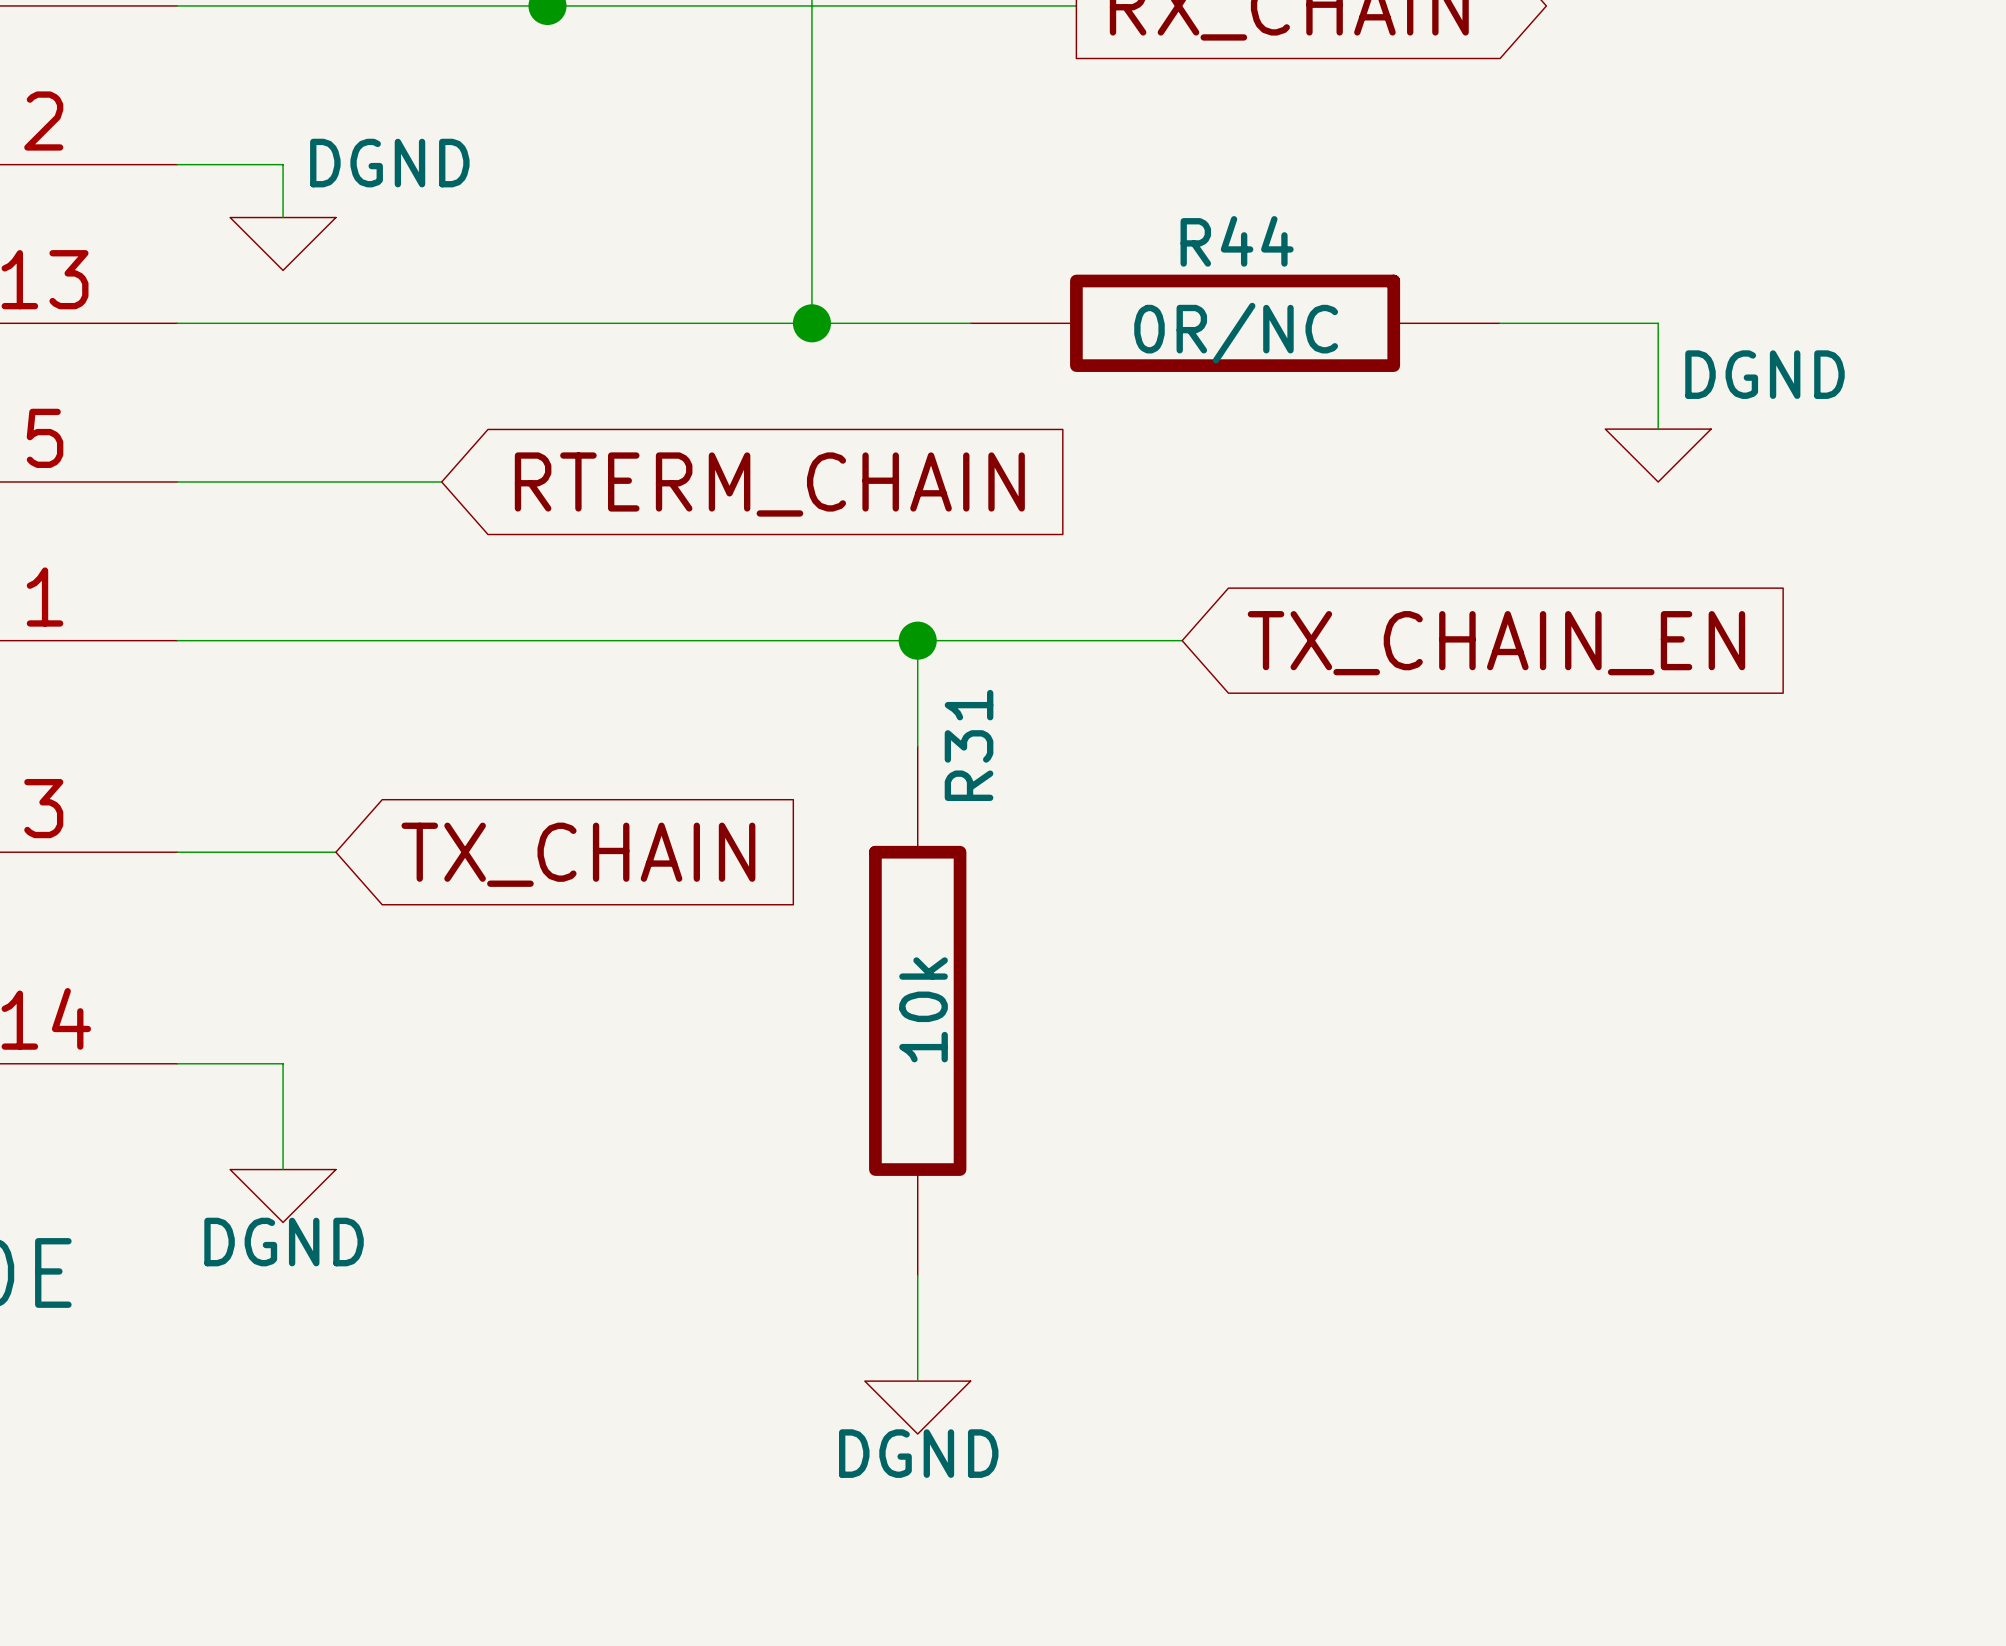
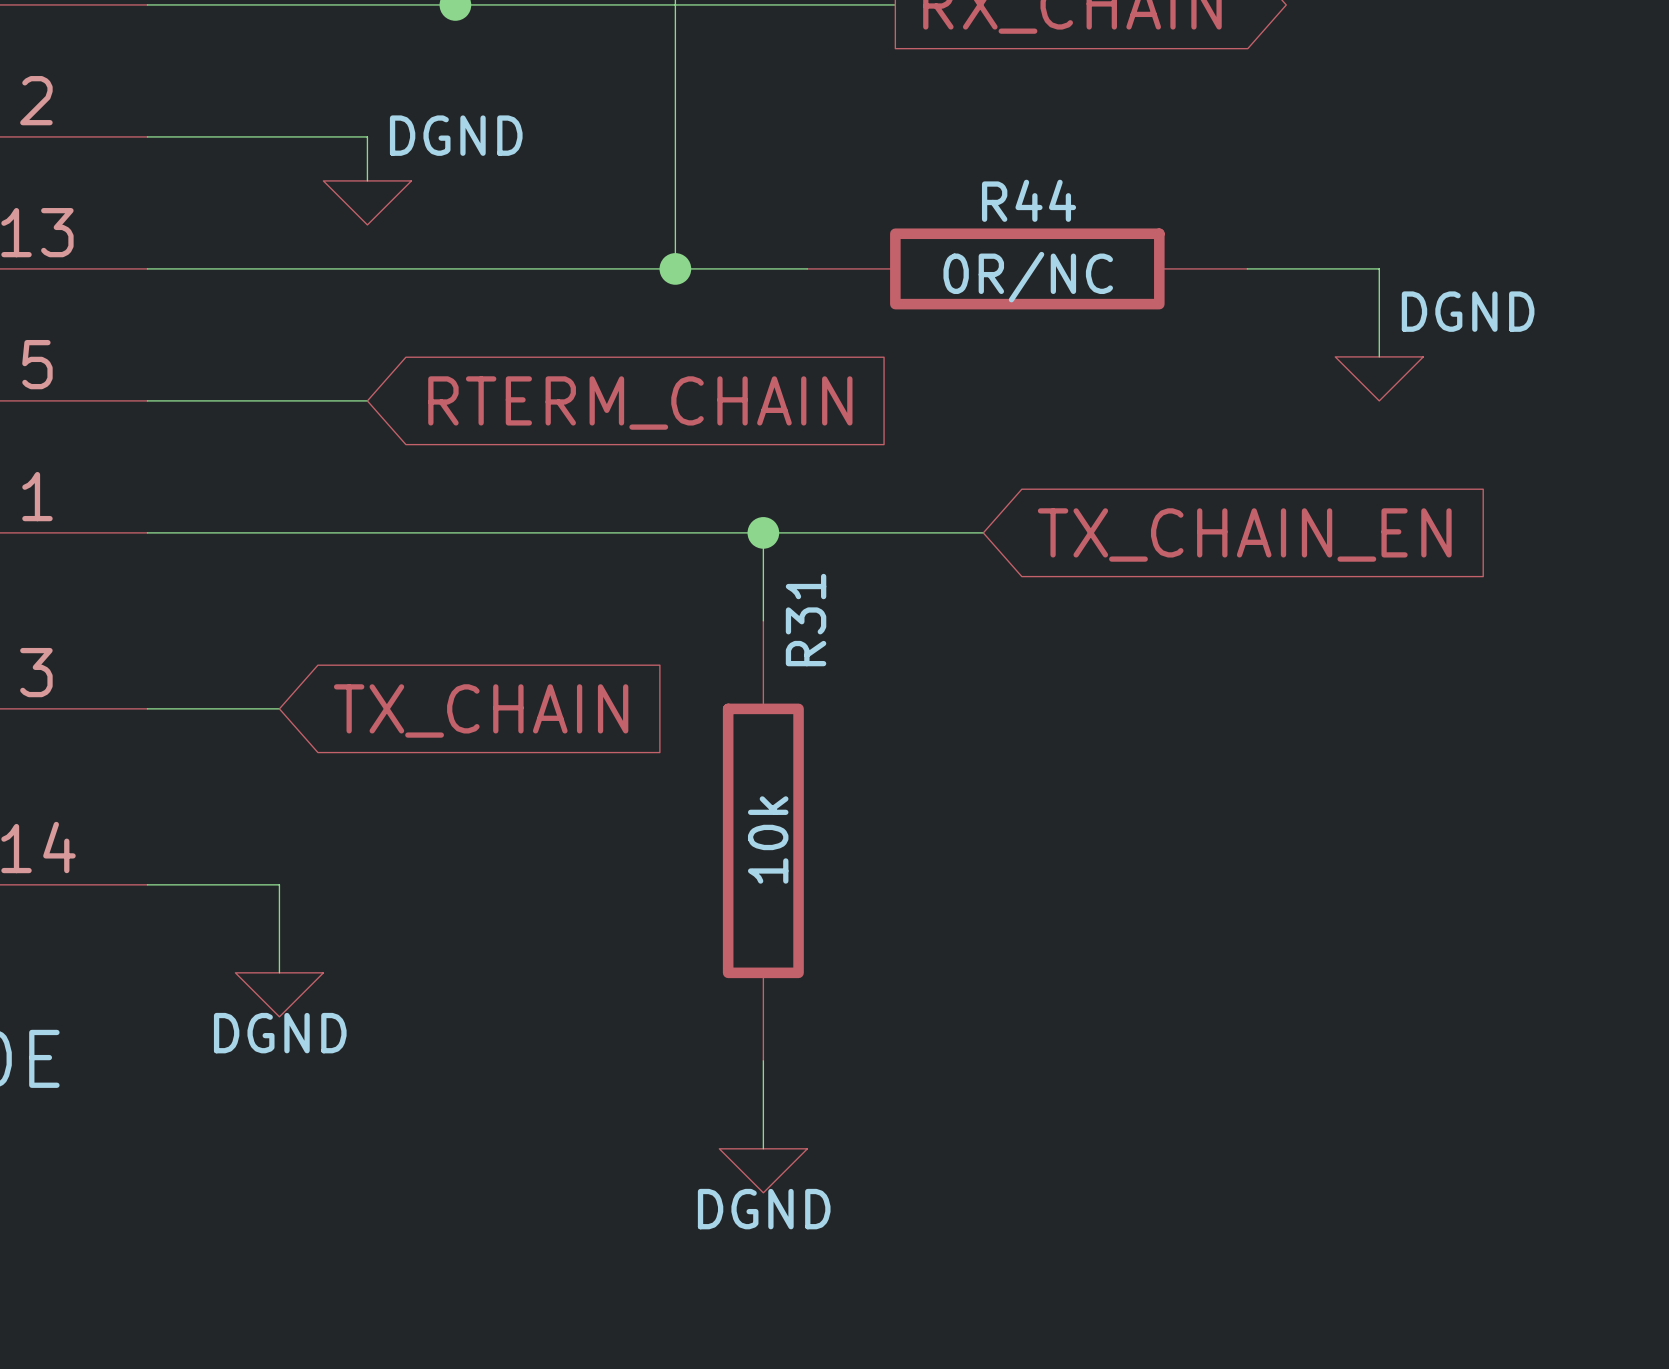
wire: (283, 164) (283, 217) -> (235, 136) (367, 136) (367, 180)
power symbol position: DGND (283, 243) -> DGND (367, 202)
wire: (283, 1063) (283, 1169) -> (235, 884) (279, 884) (279, 972)
power symbol position: DGND (283, 1196) -> DGND (279, 994)

